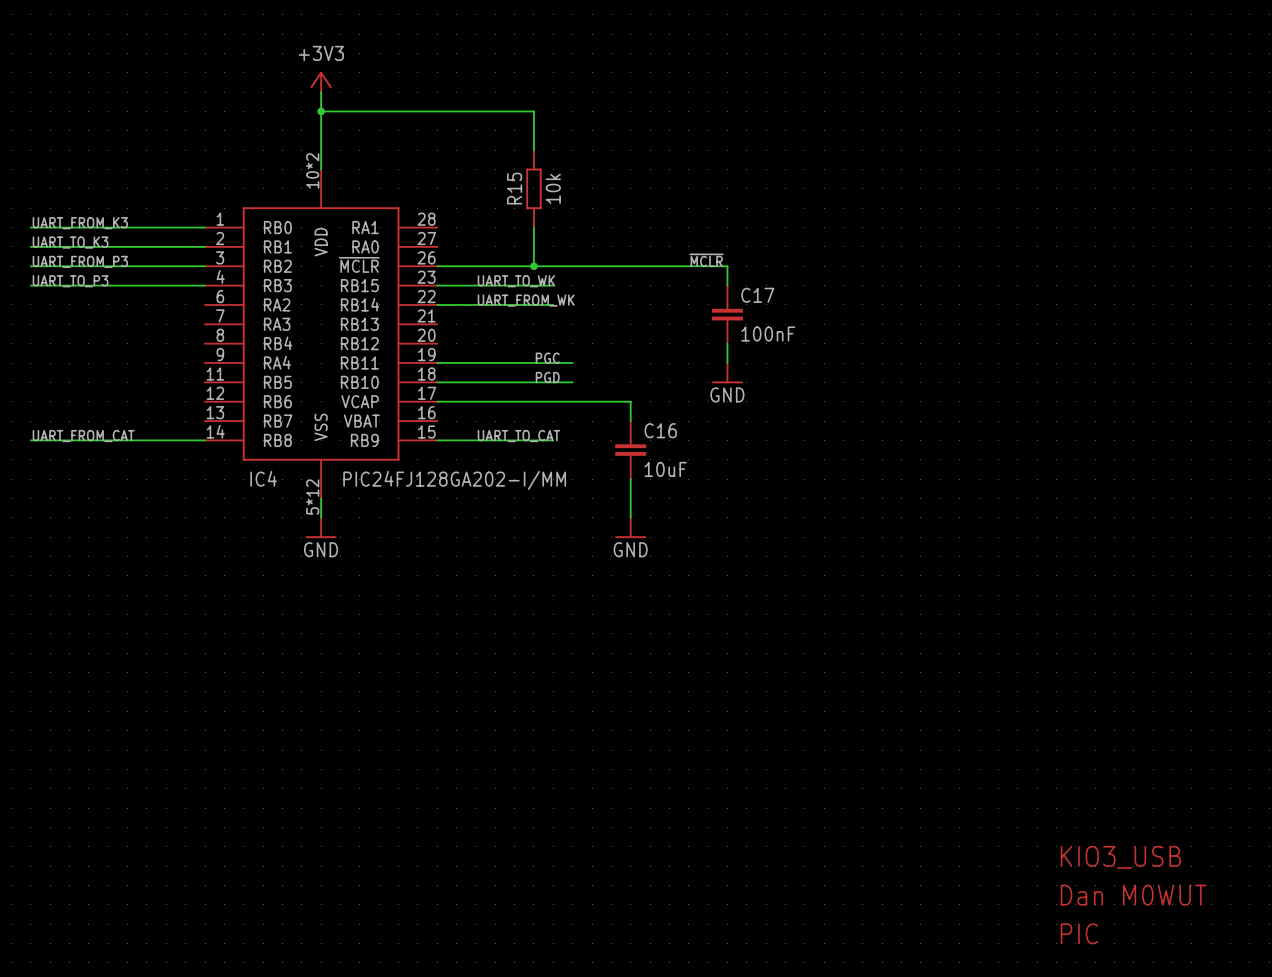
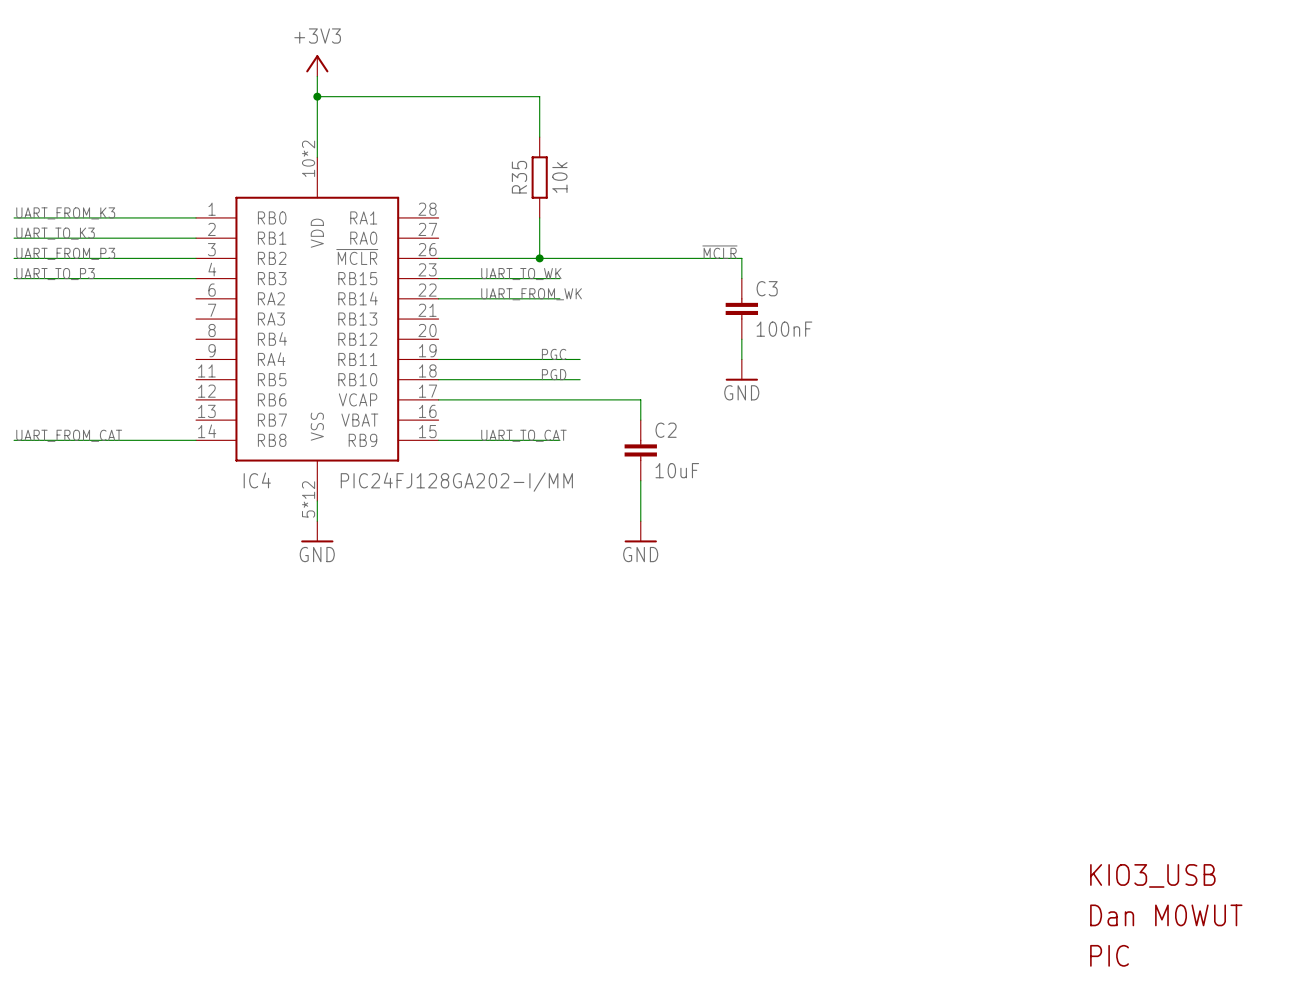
R15 name: R15 (514, 188) -> R35 (519, 177)
C17 name: C17 (757, 295) -> C3 (767, 288)
C16 name: C16 (660, 430) -> C2 (666, 430)

